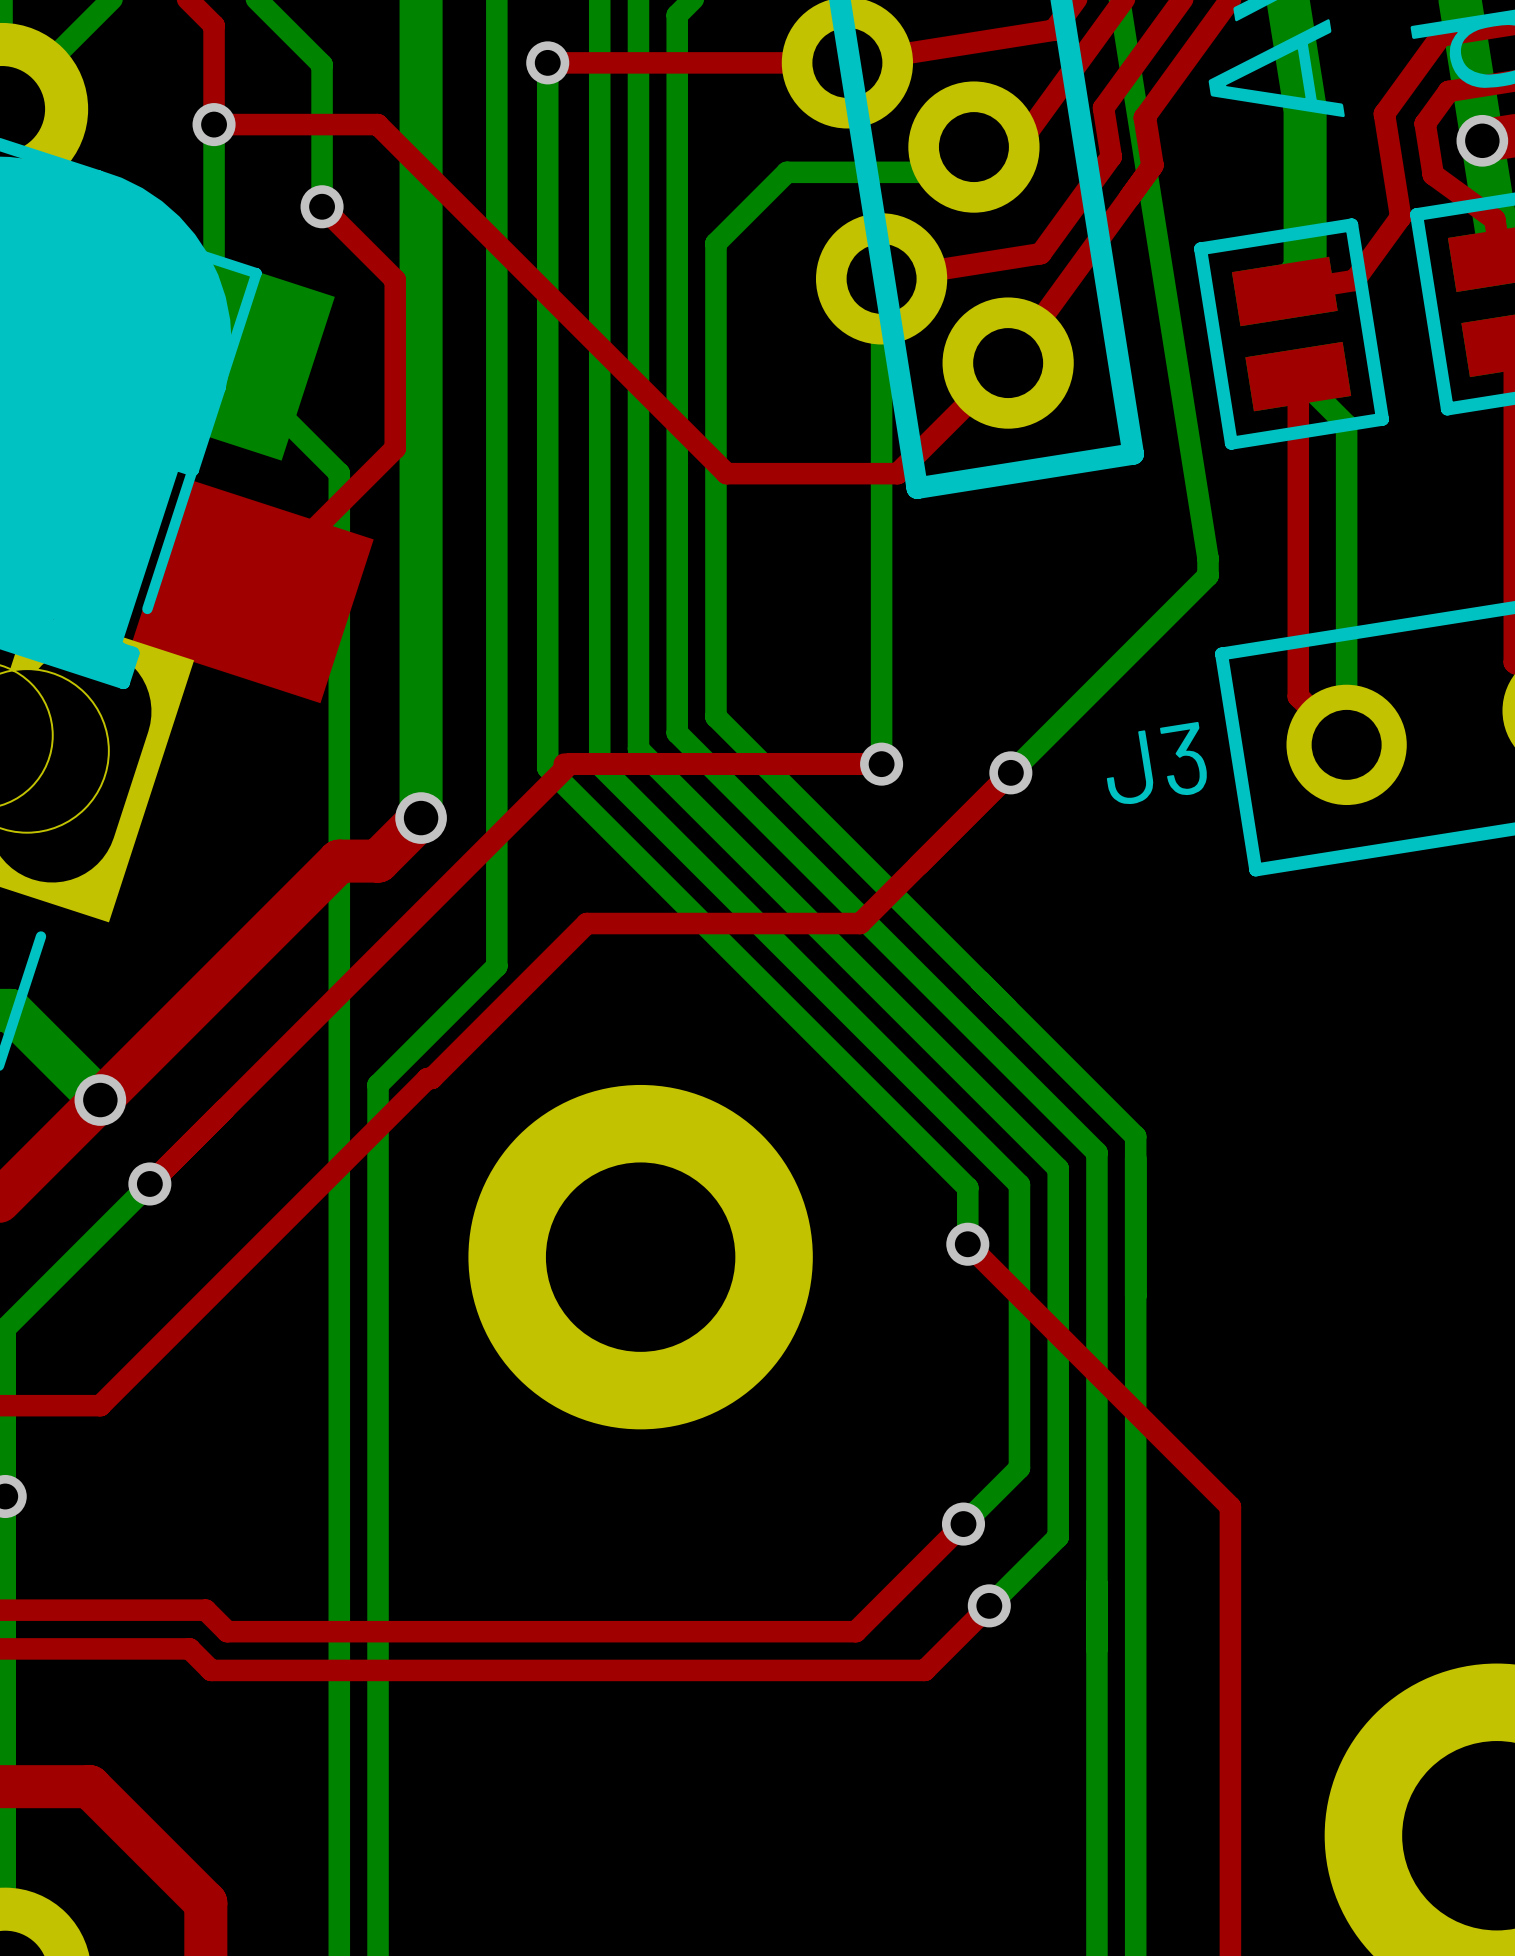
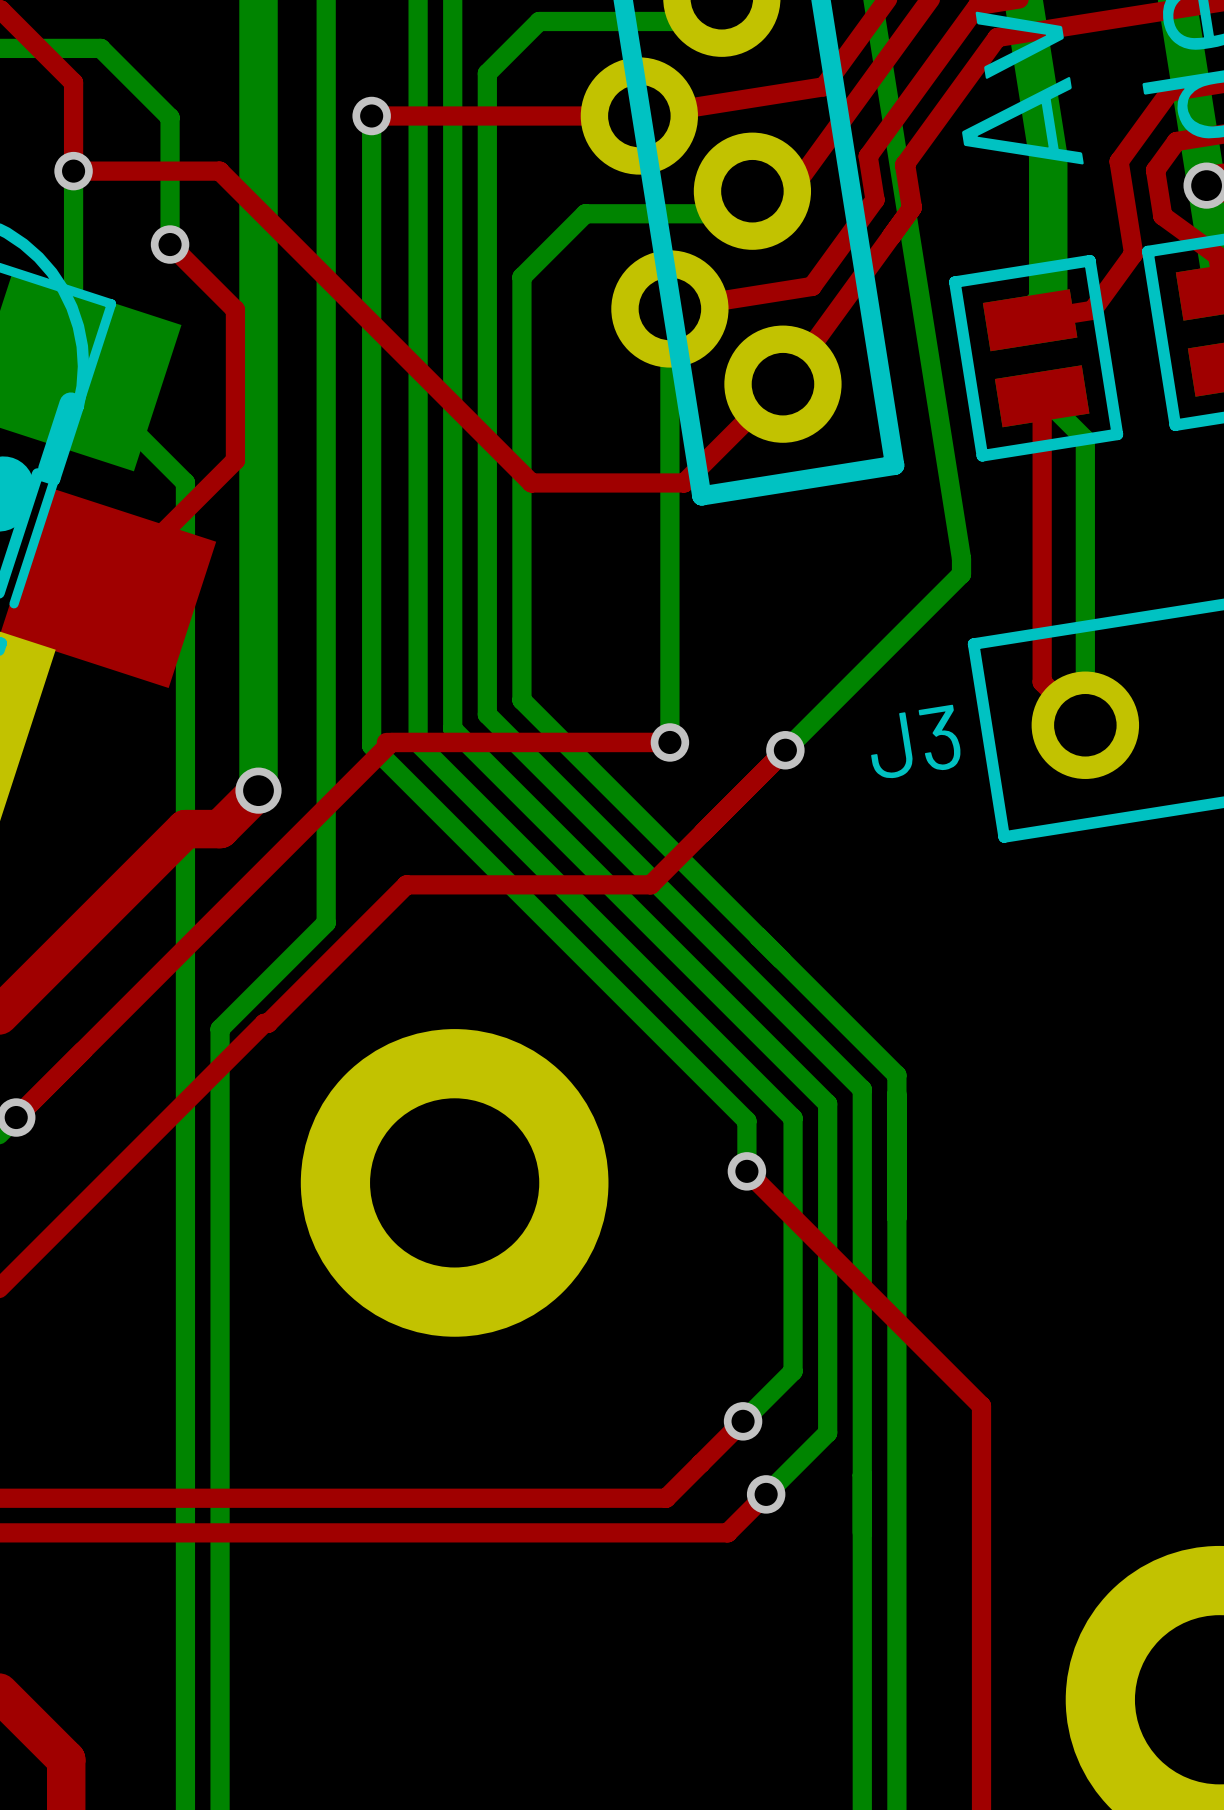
top track: (205, 1610) (227, 1631) (855, 1631) (877, 1610) -> (66, 1498) (666, 1498)
top track: (189, 1648) (211, 1670) (924, 1670) (946, 1648) -> (51, 1532) (727, 1532)

